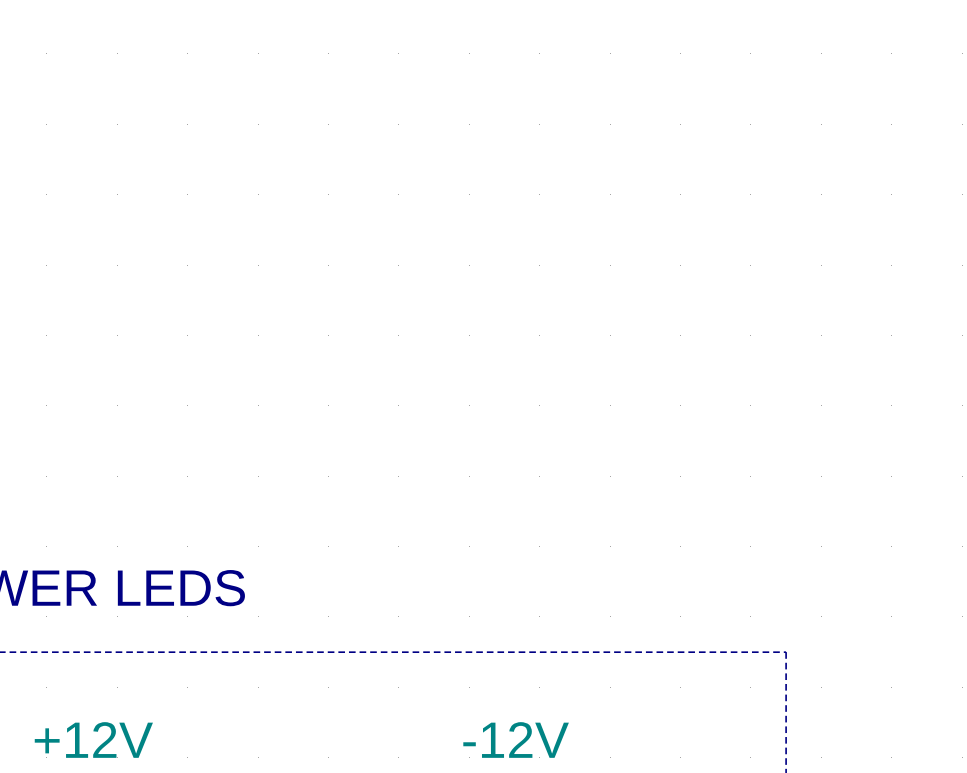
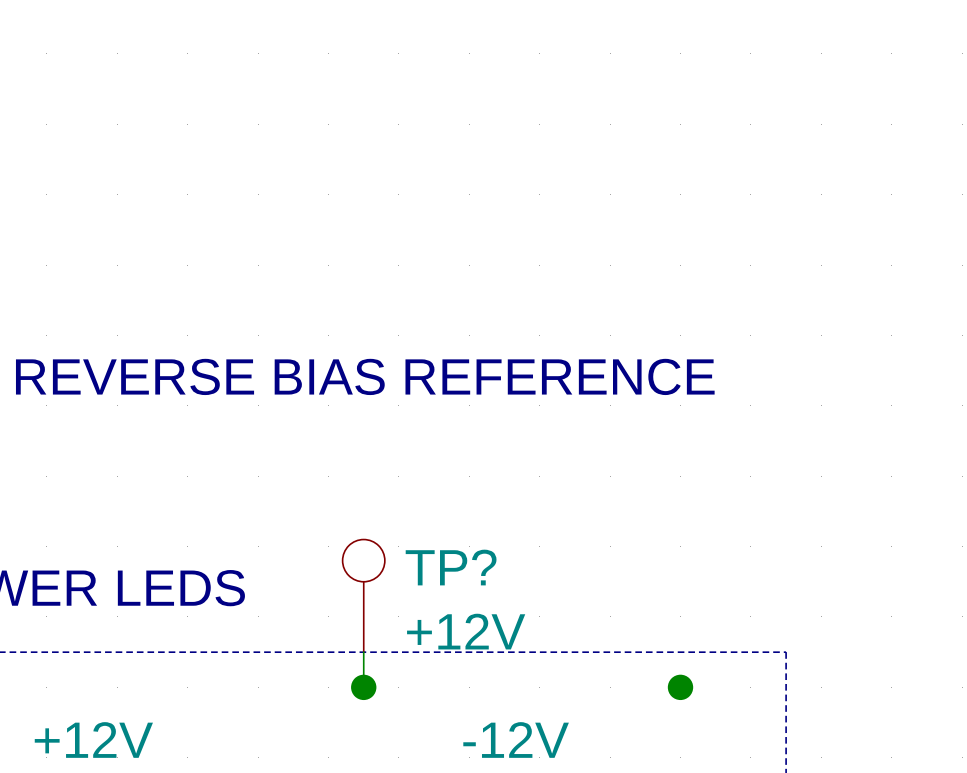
text: none -> REVERSE BIAS REFERENCE (365, 376)
TP?: none -> +12V (363, 595)
wire: none -> (363, 652) (363, 687)
junction: none -> (363, 687)
junction: none -> (680, 687)

